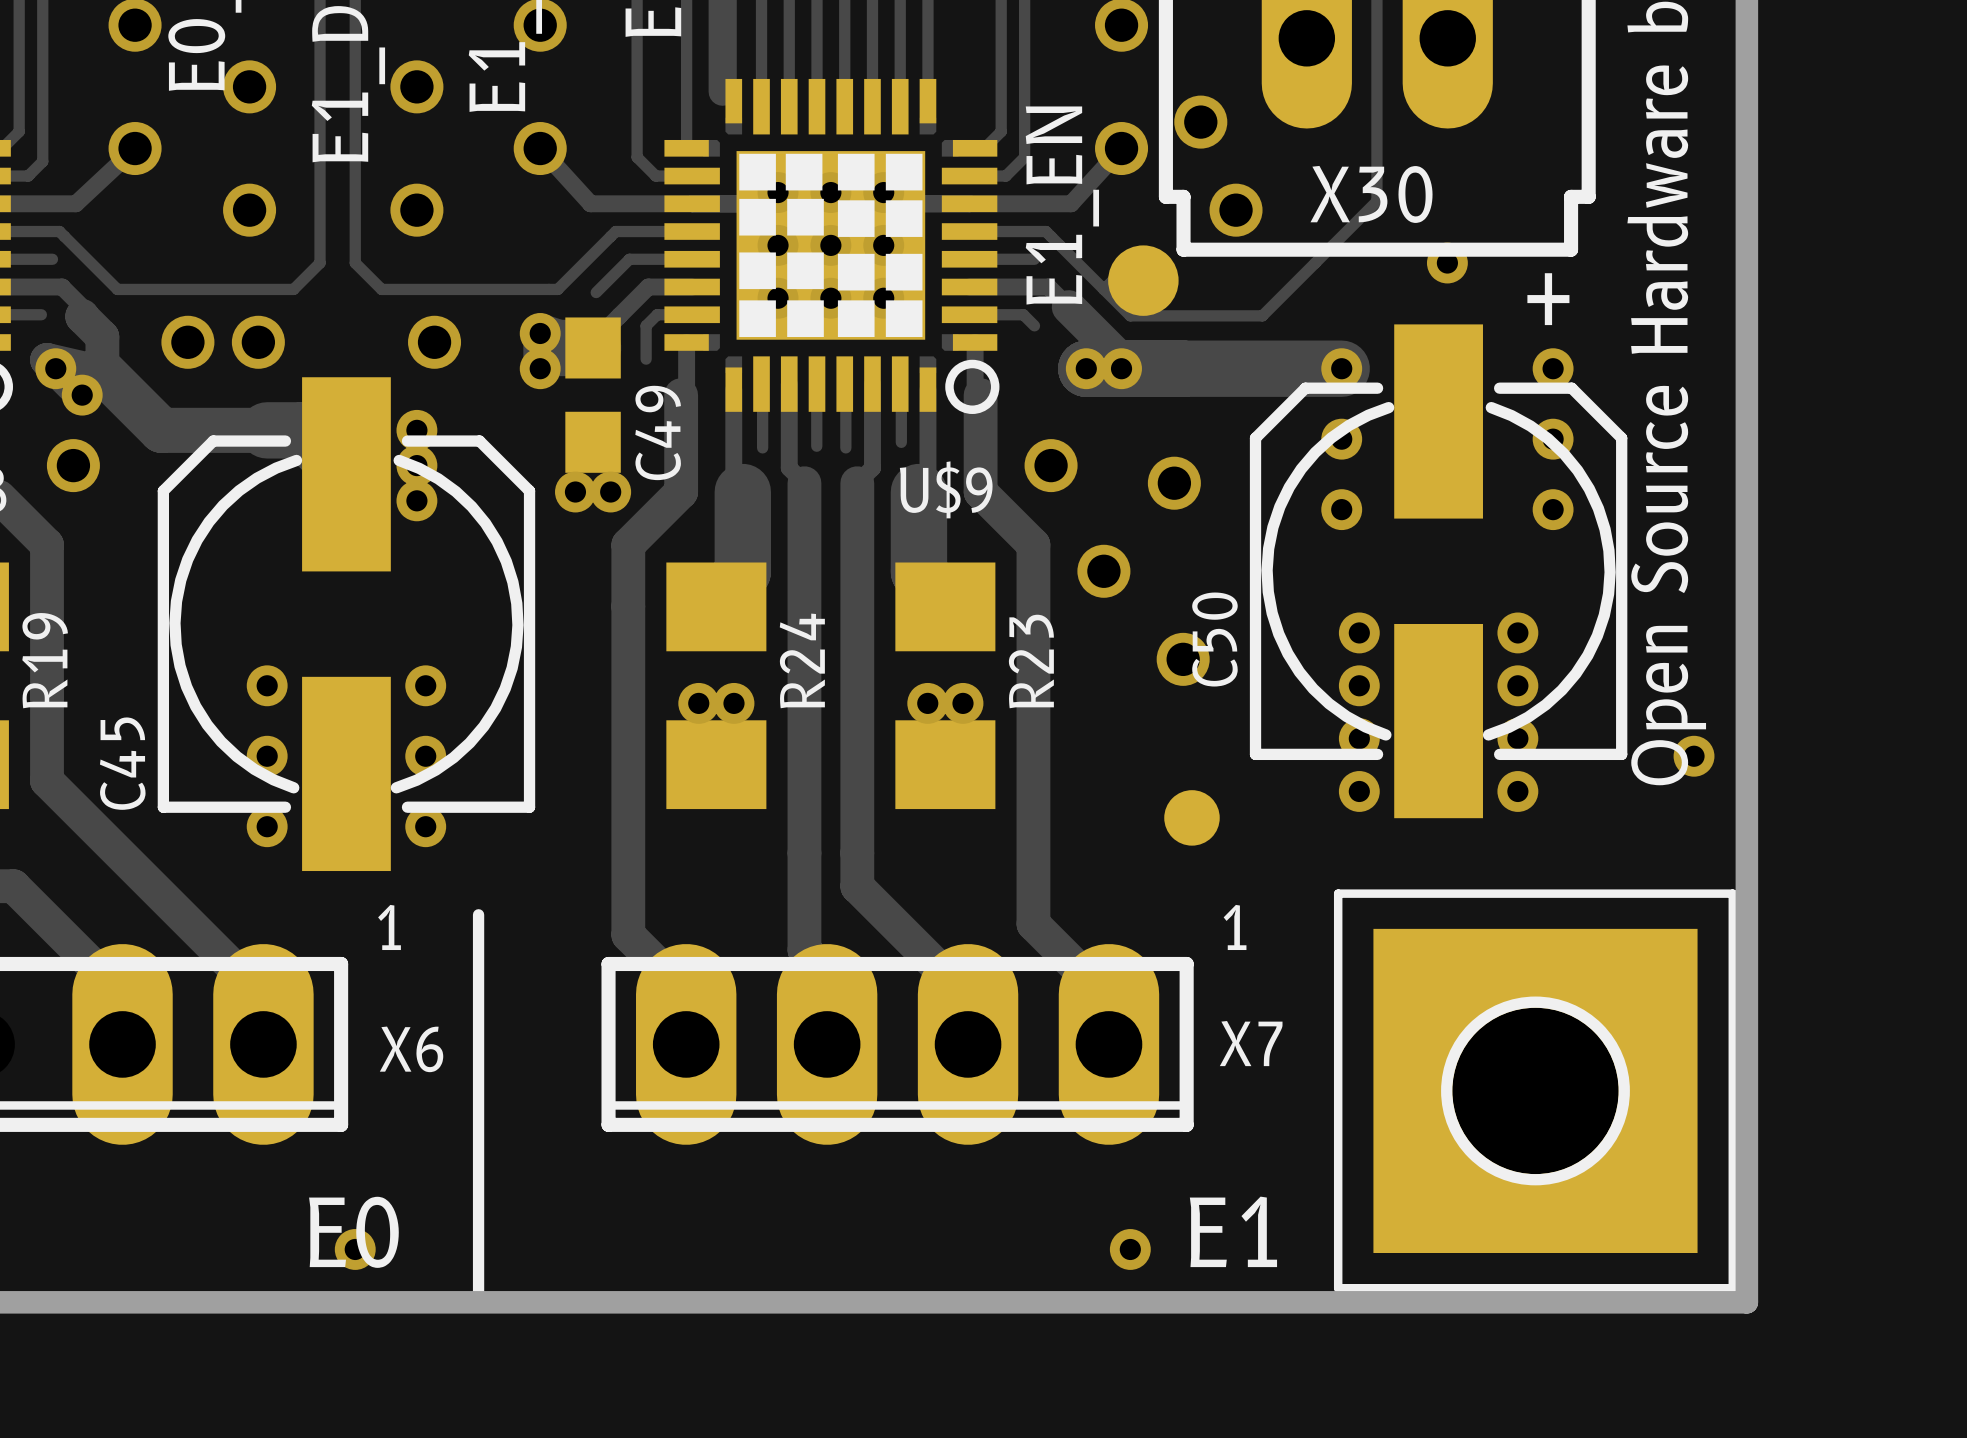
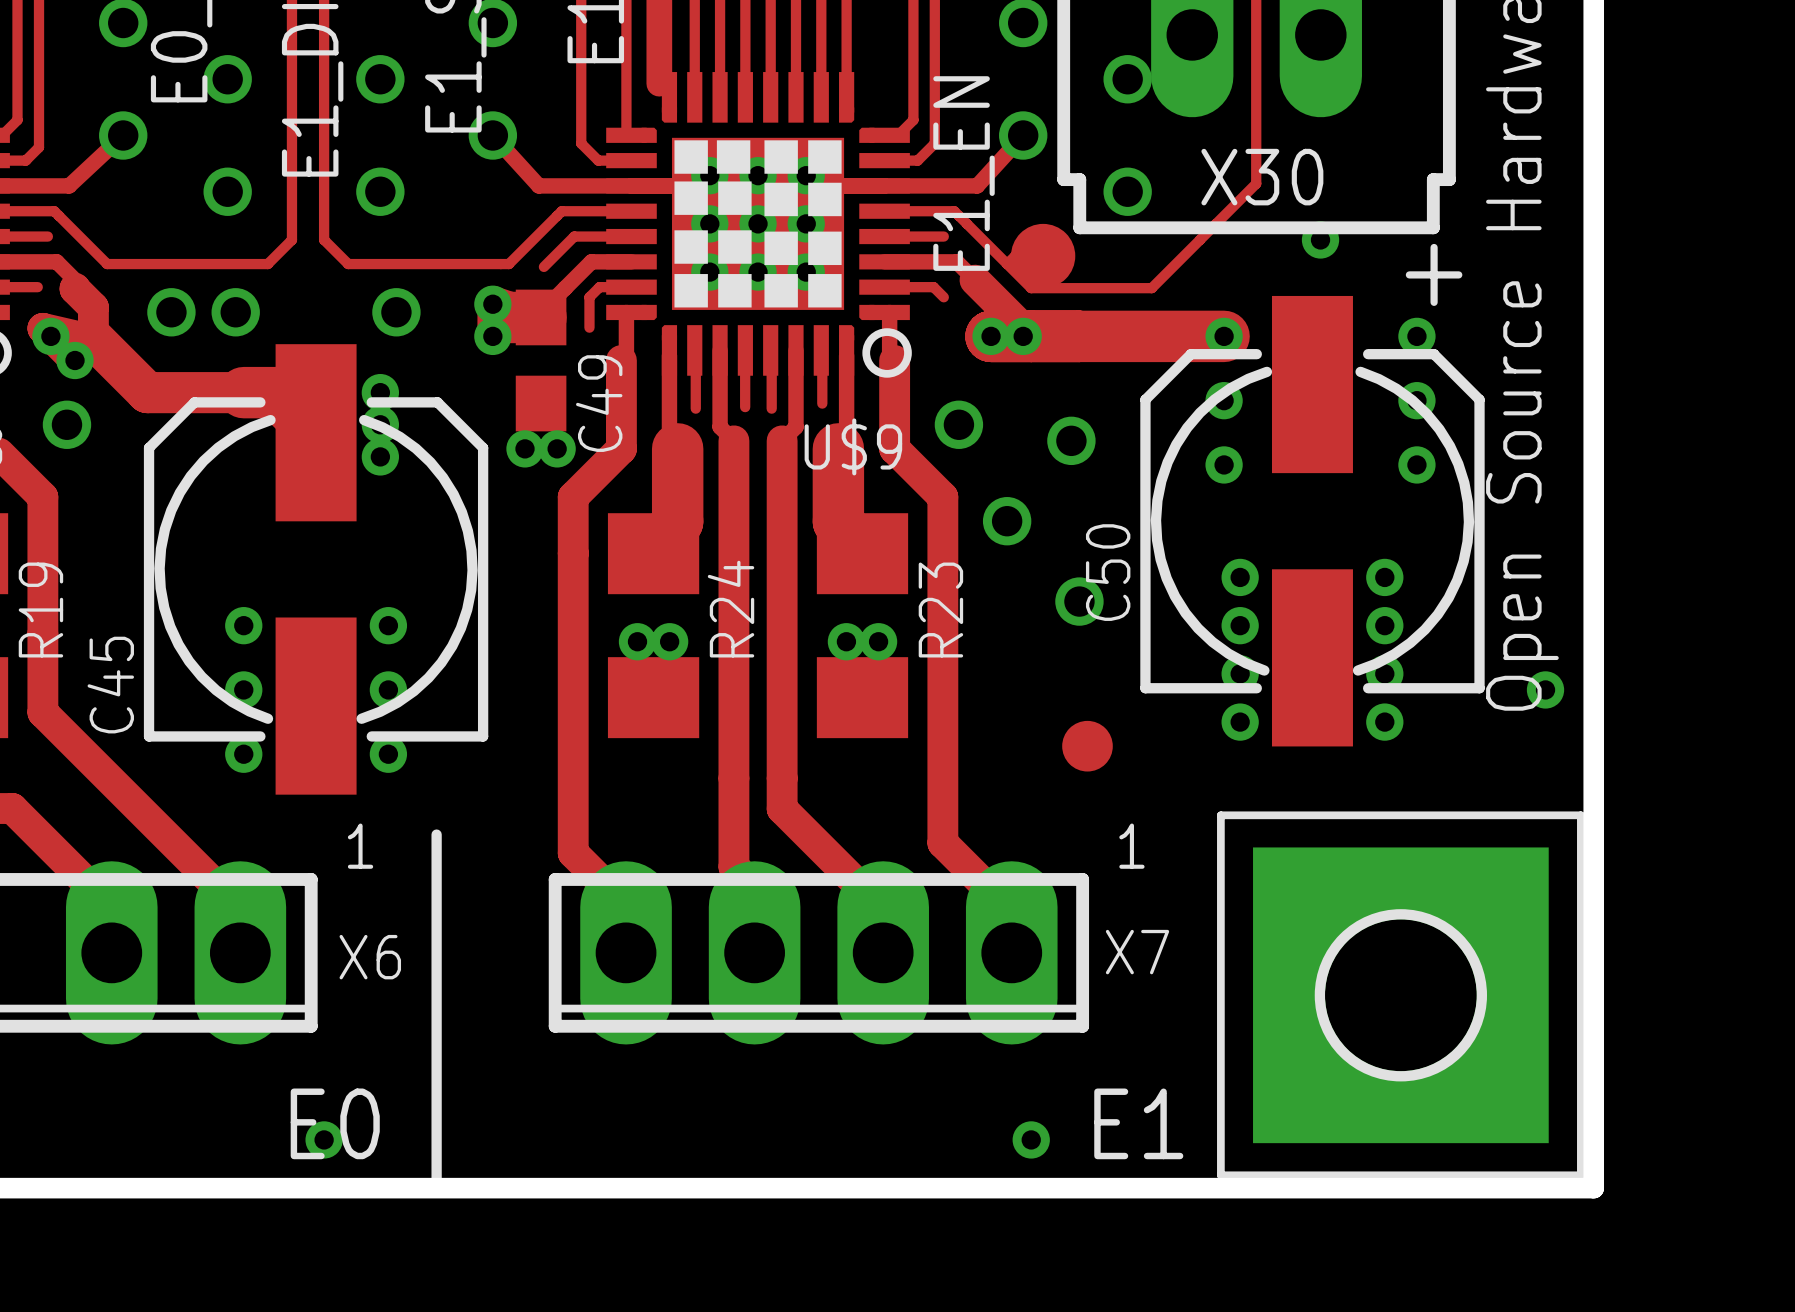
via position: (1200, 122) -> (1127, 79)

